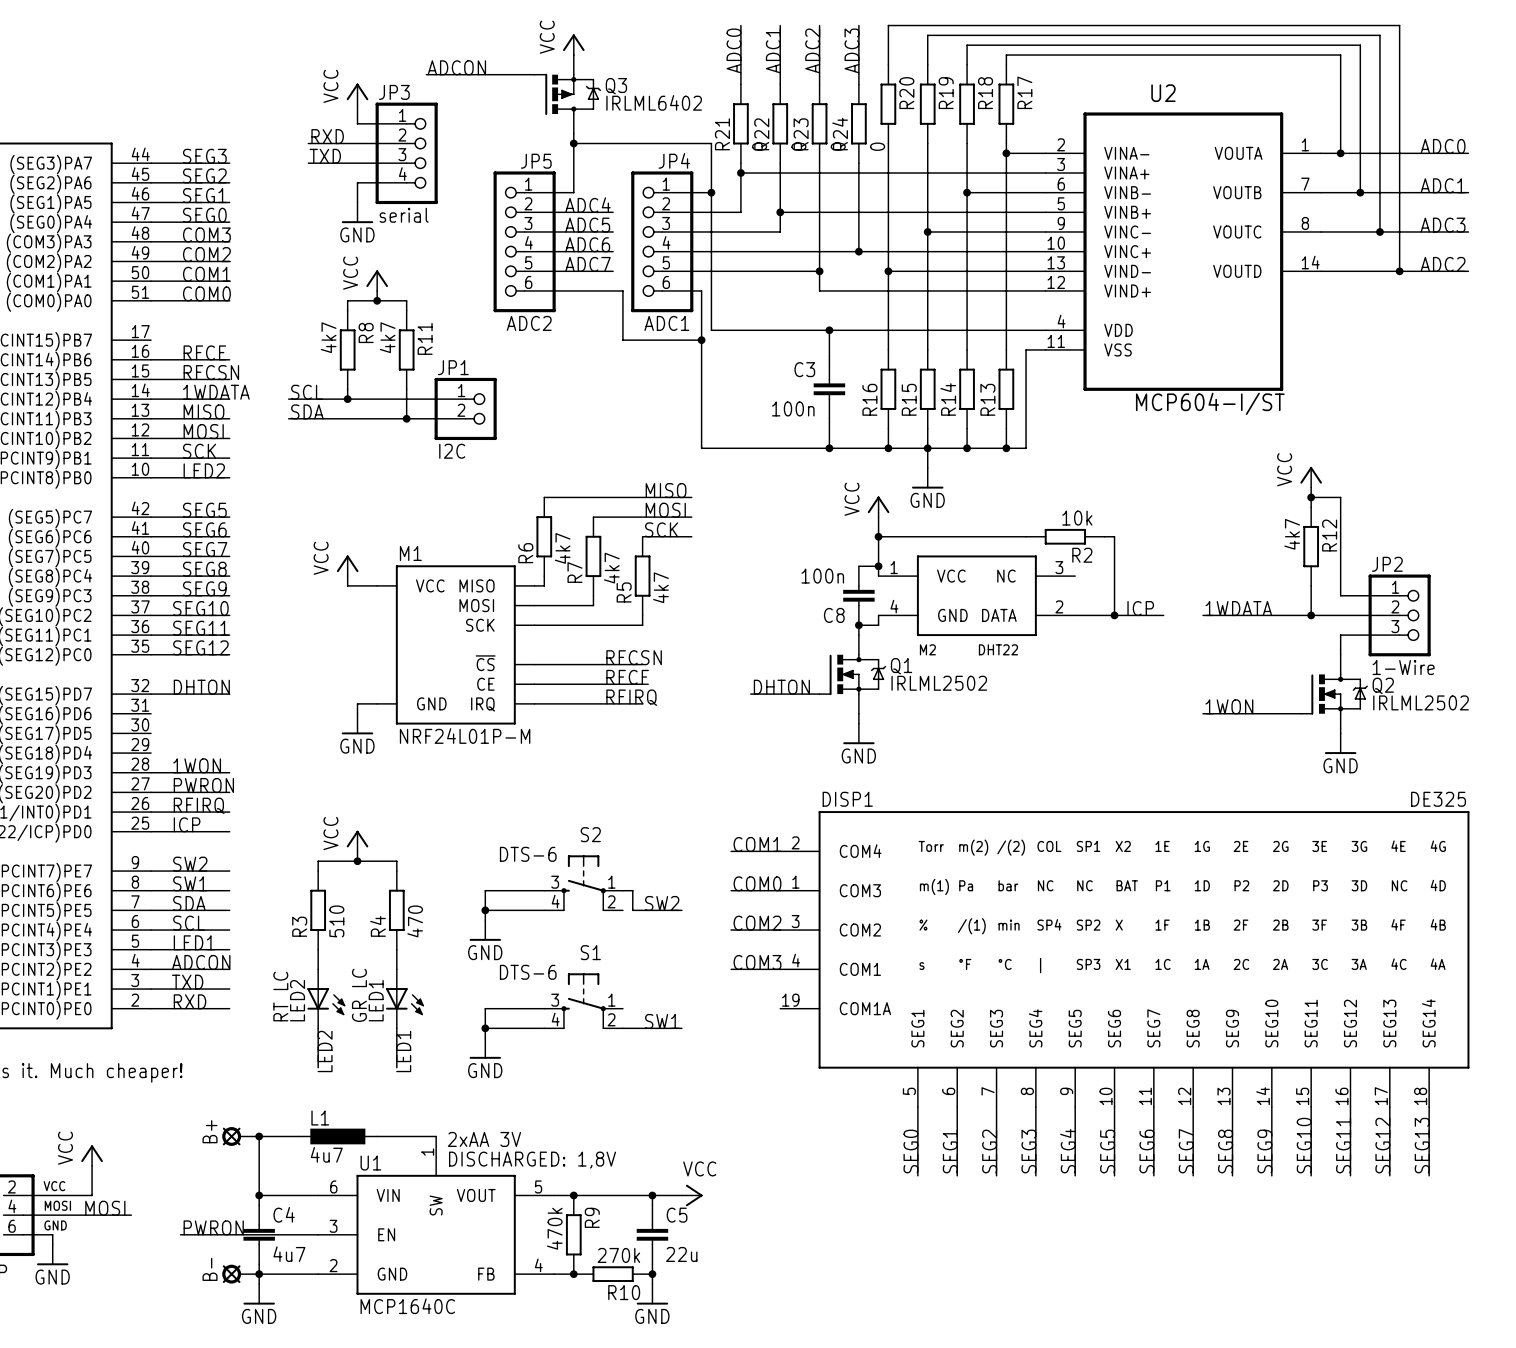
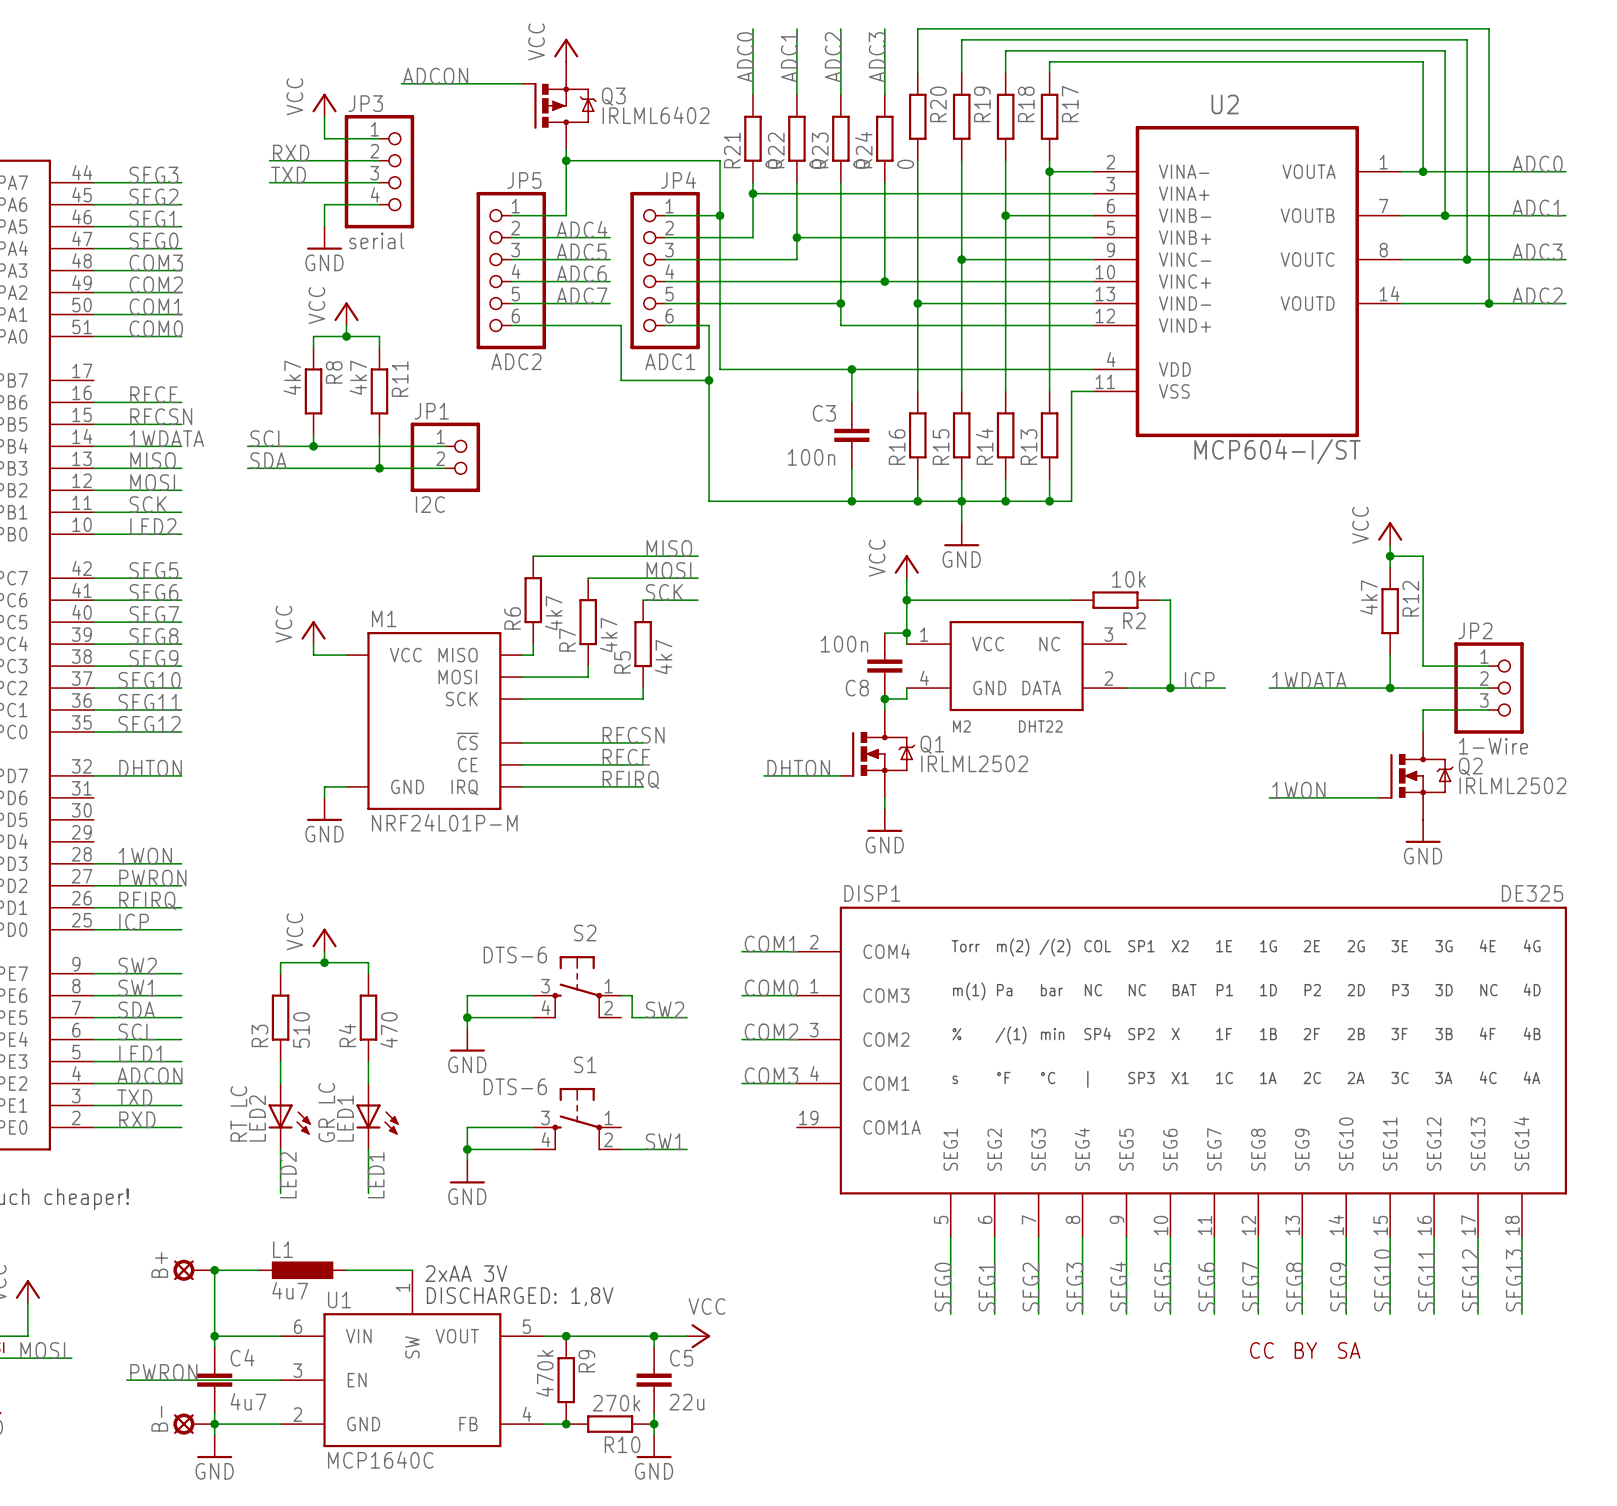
part: none -> (1261, 1350)
part: none -> (1305, 1350)
part: none -> (1349, 1350)

